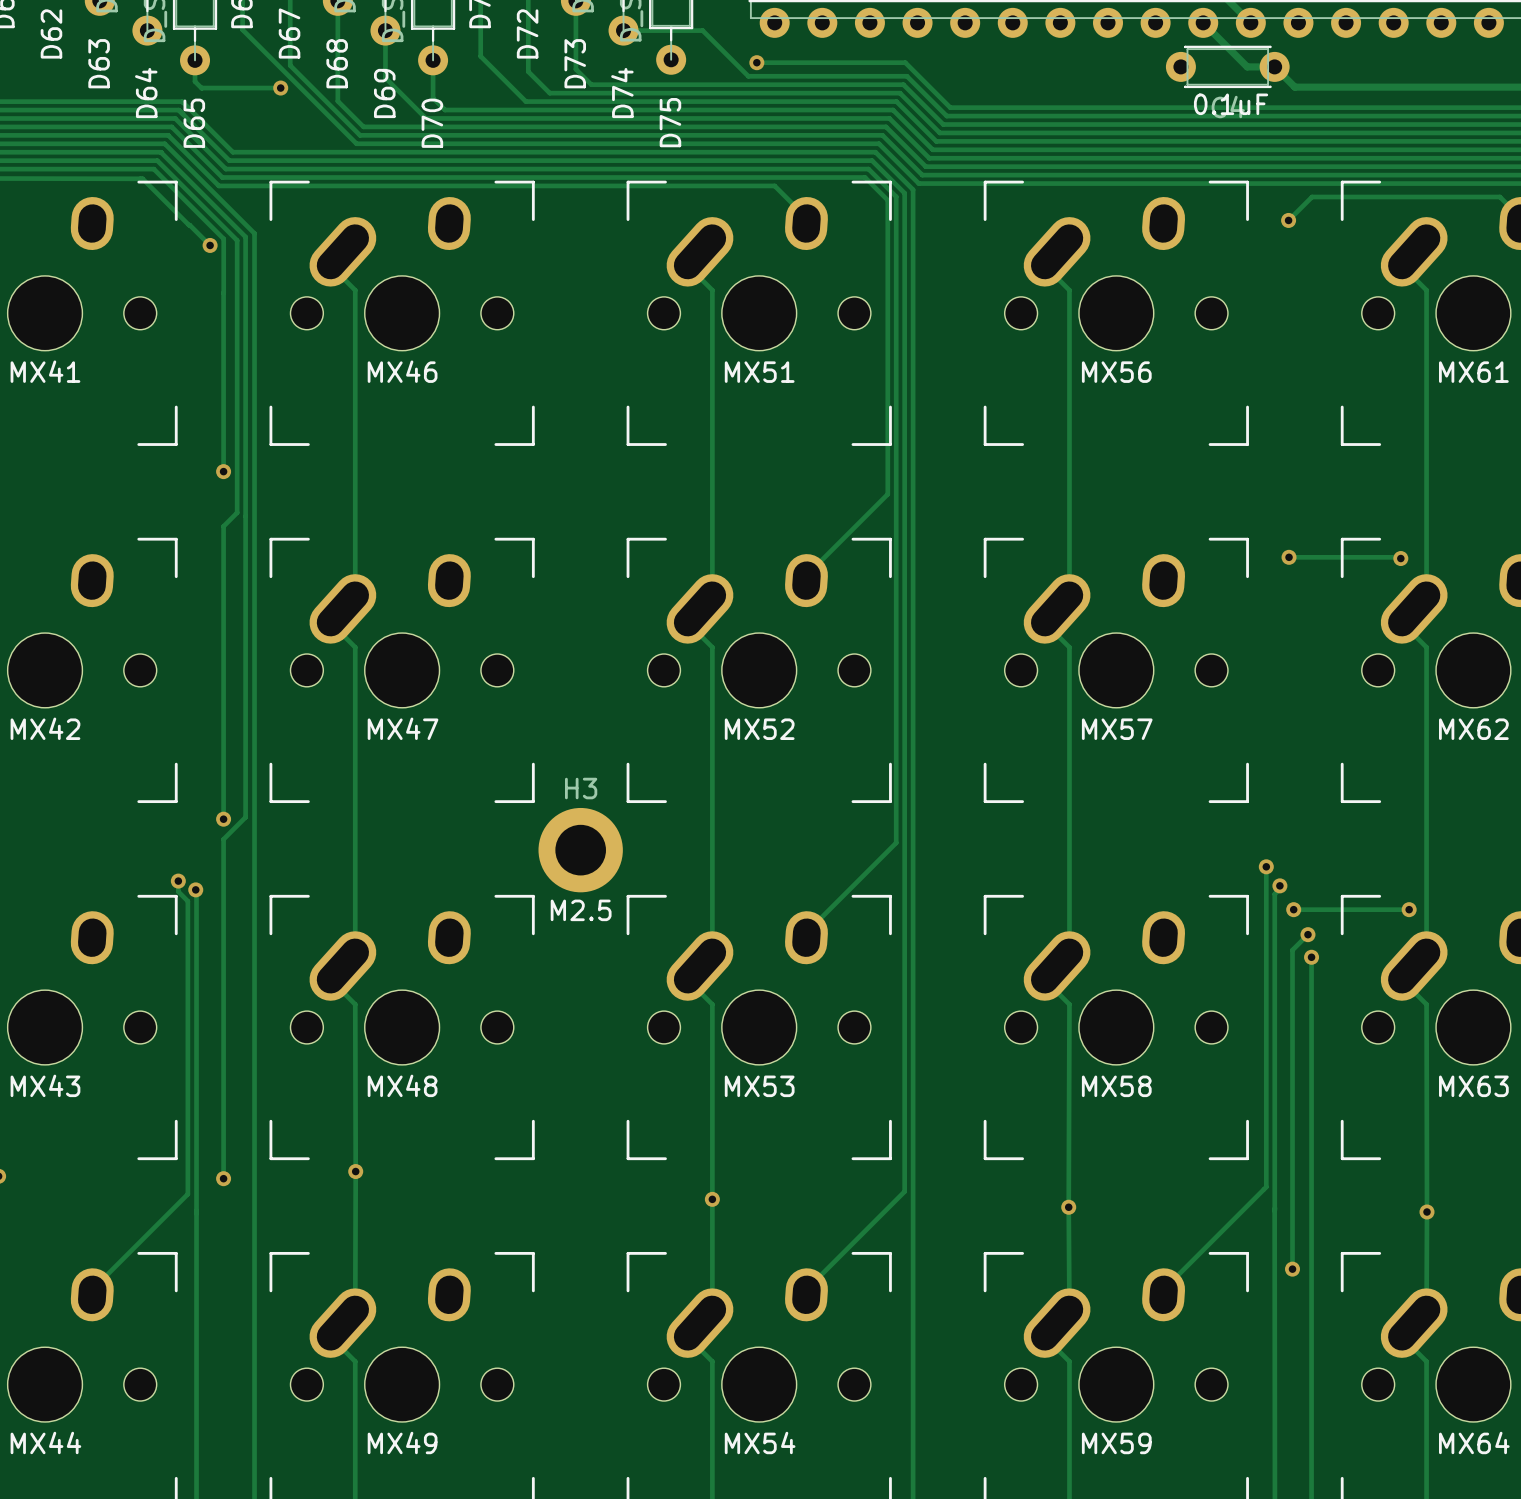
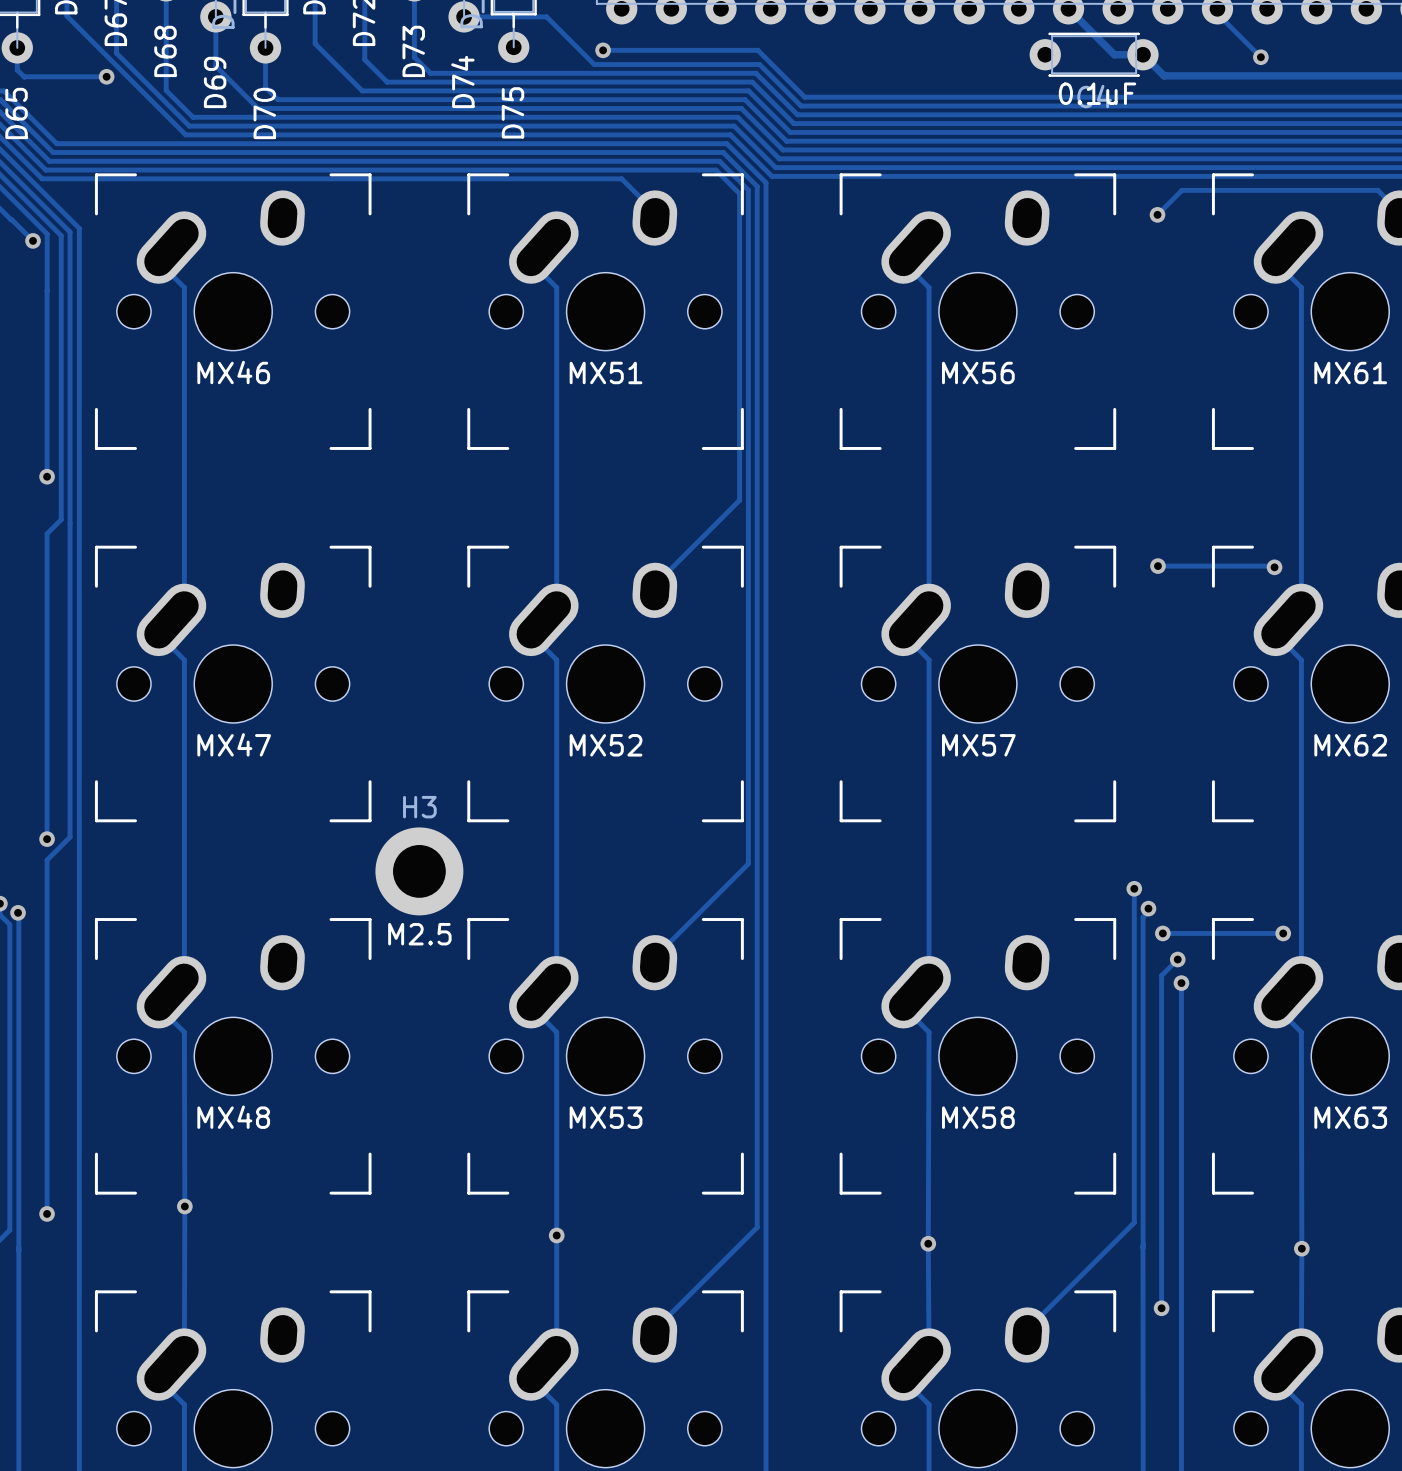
track: none -> (1217, 8) (1217, 13) (1260, 57)
via: none -> (1260, 57)

